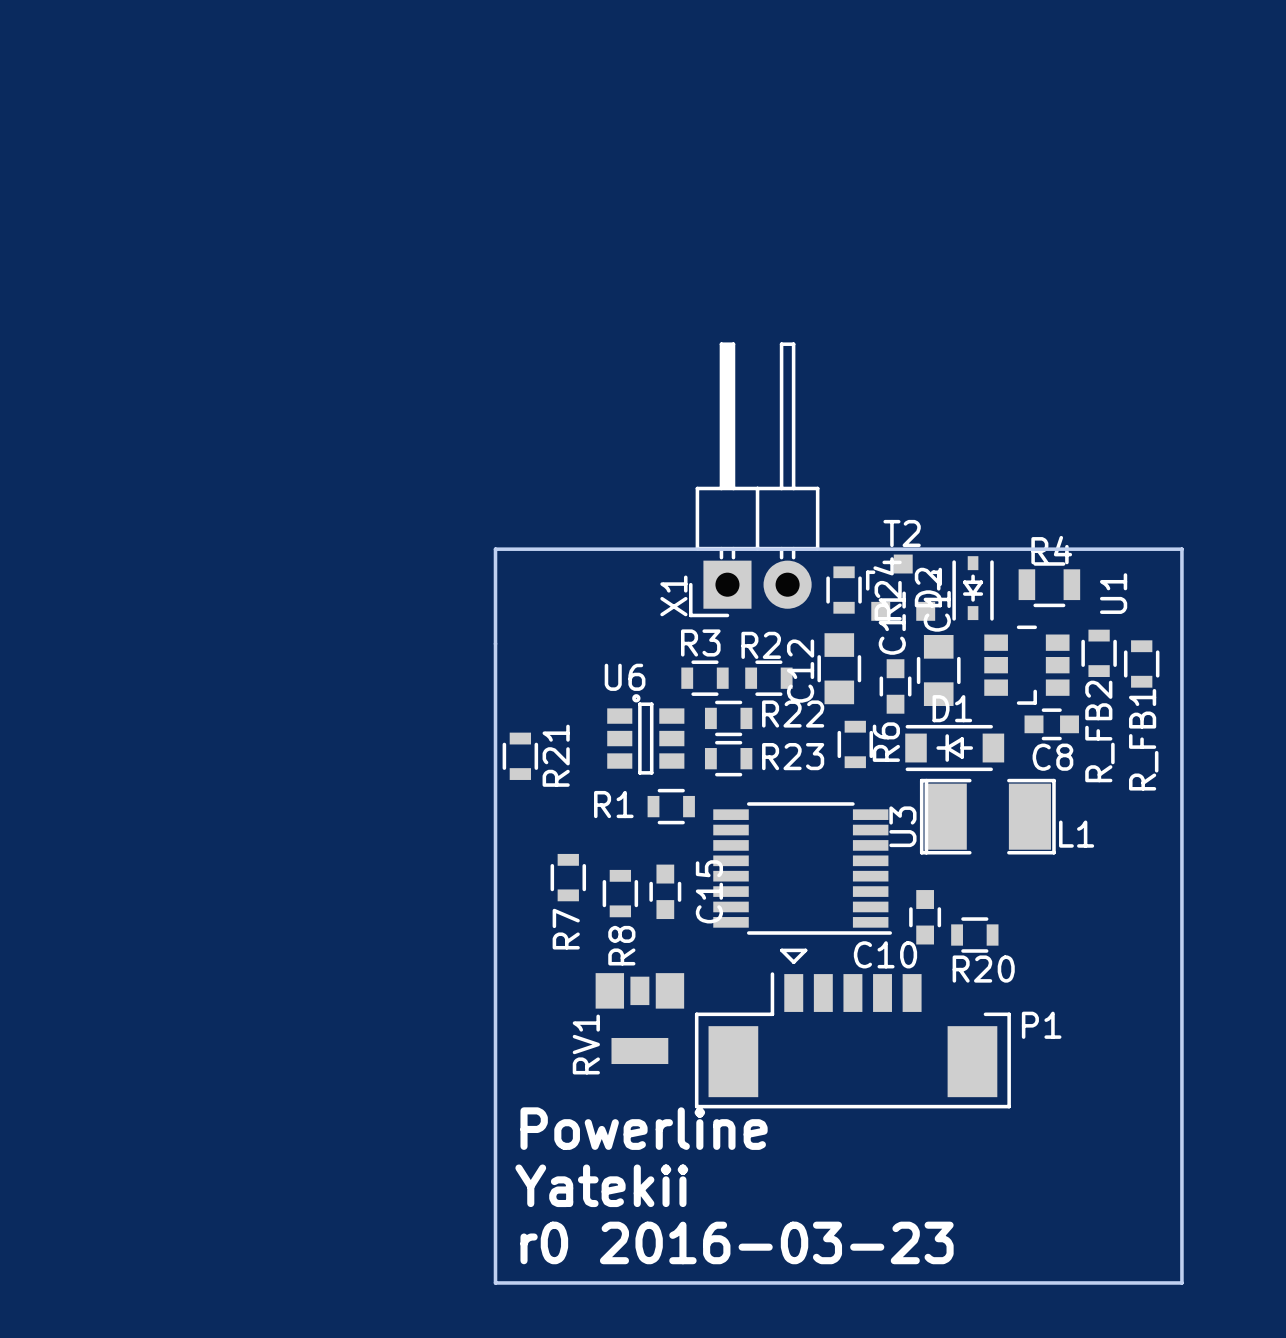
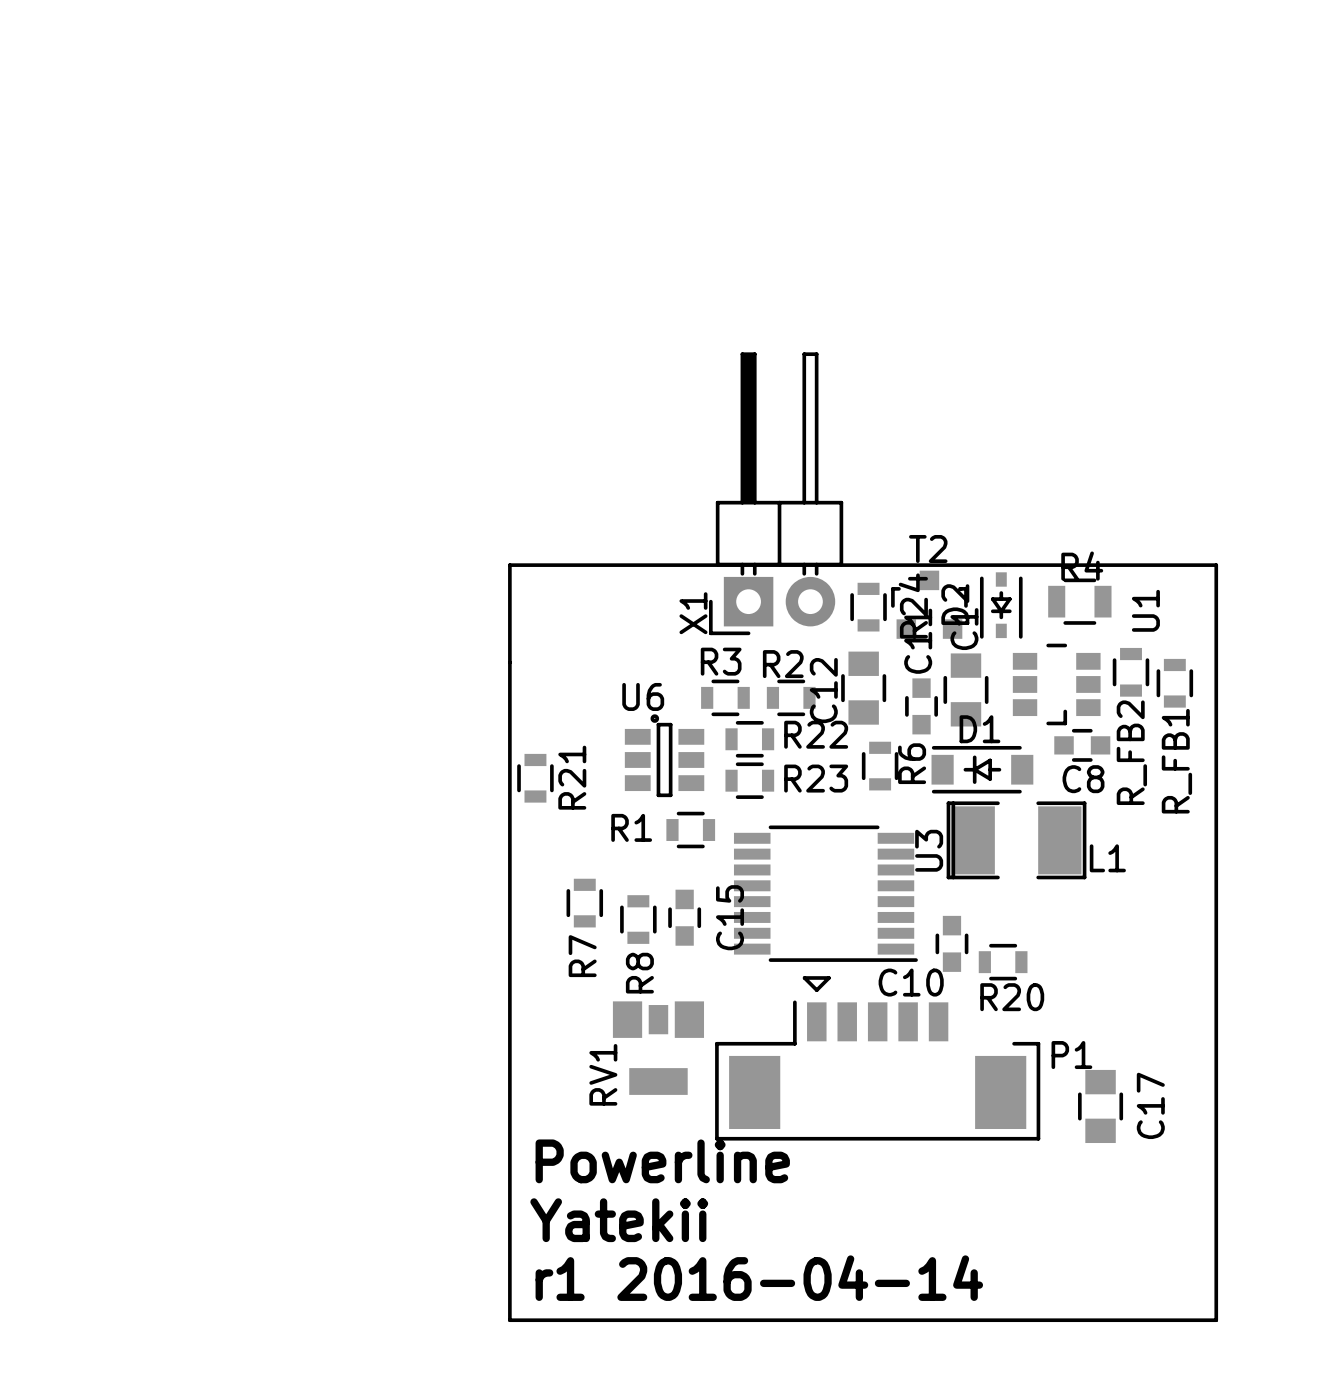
C17: none -> (1100, 1106)
text: r0 2016-03-23 (737, 1242) -> r1 2016-04-14 (759, 1278)

